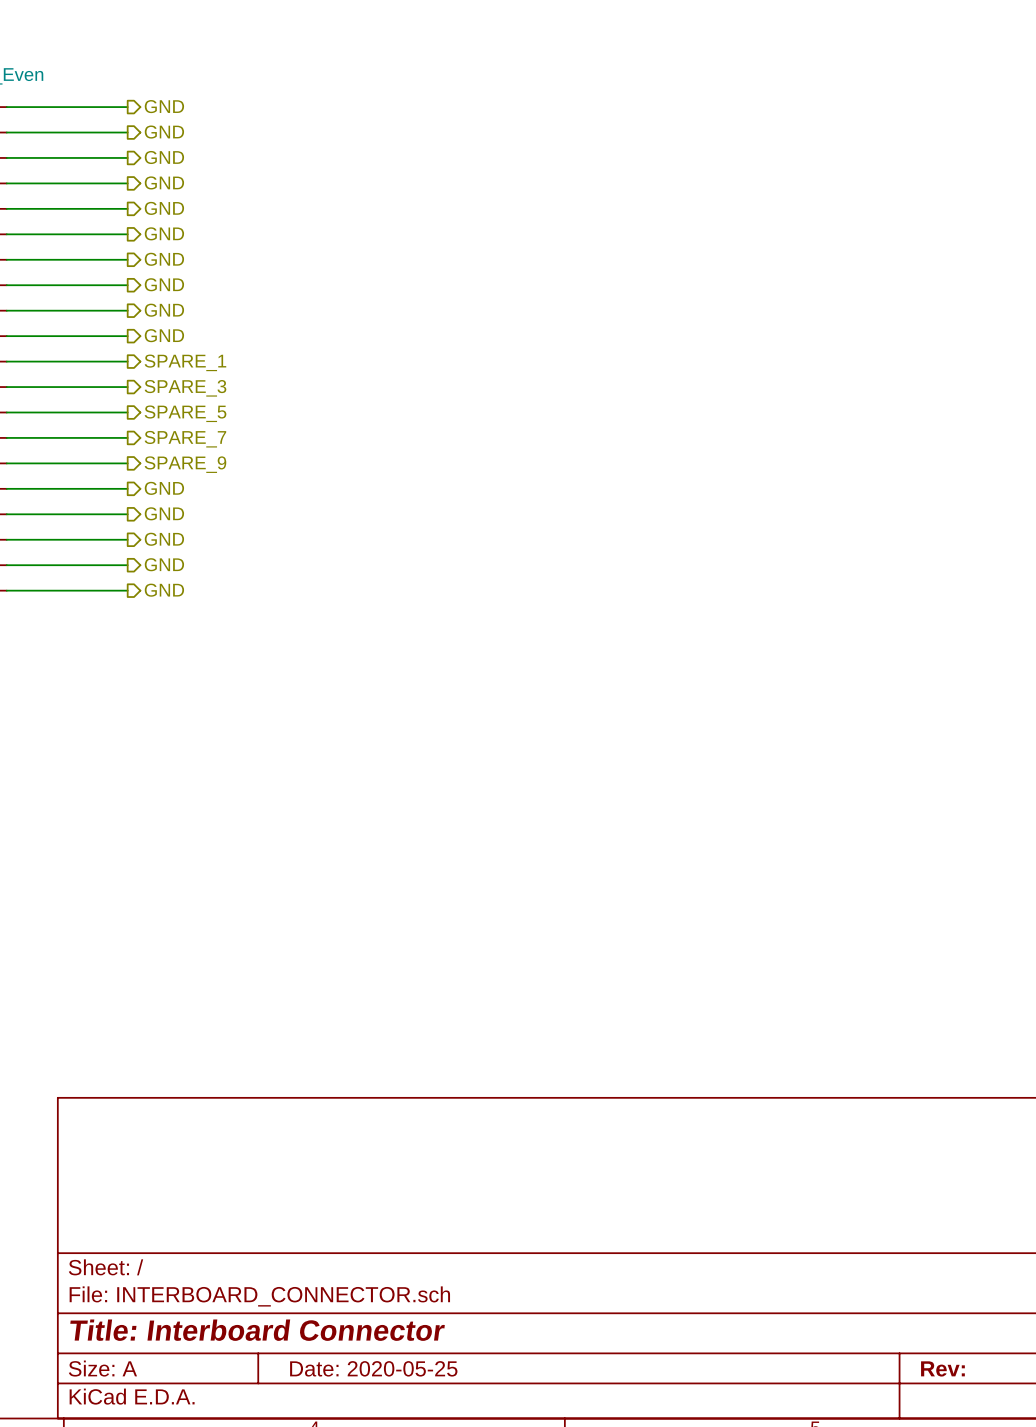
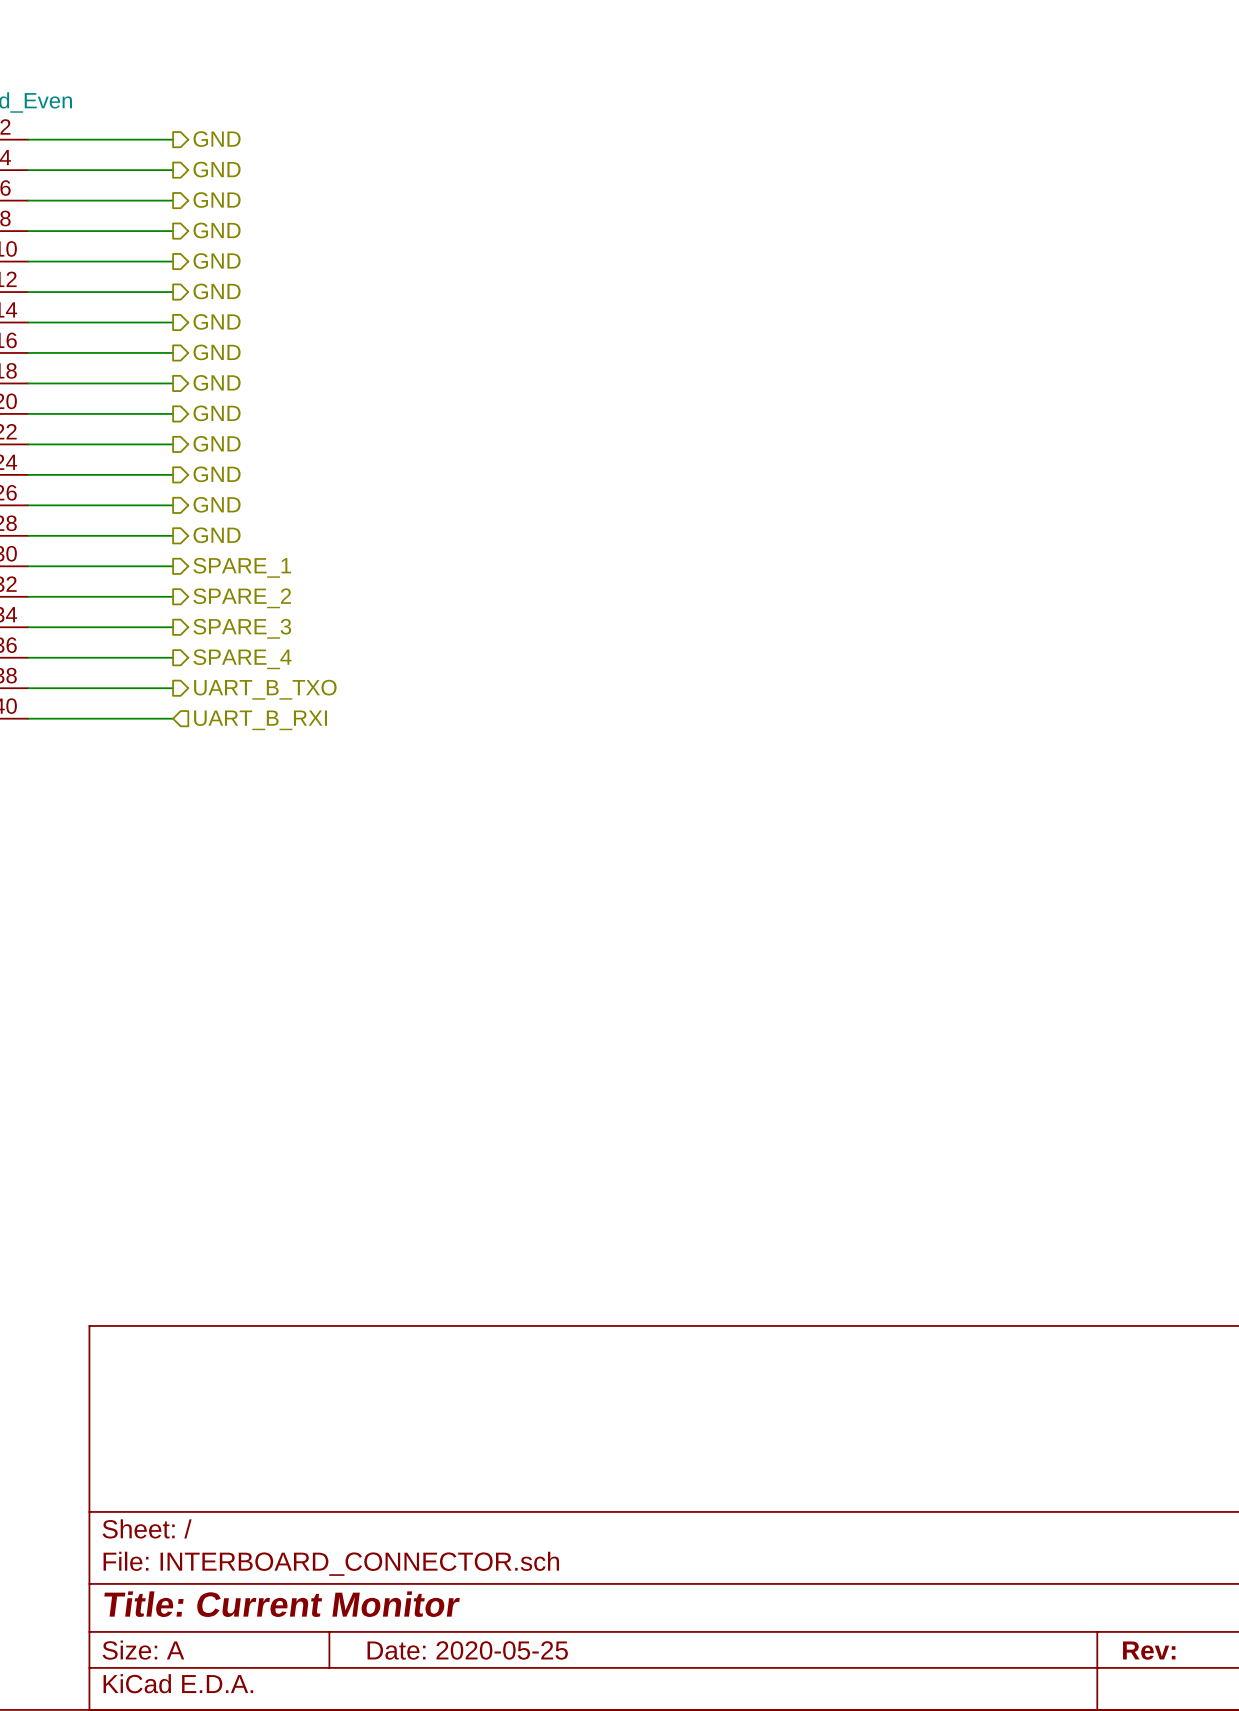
hierarchical label: SPARE_1 (185, 362) -> GND (217, 443)
hierarchical label: SPARE_3 (185, 388) -> GND (217, 474)
hierarchical label: SPARE_5 (185, 413) -> GND (217, 504)
hierarchical label: SPARE_7 (185, 439) -> GND (217, 535)
hierarchical label: SPARE_9 (185, 464) -> SPARE_1 (242, 567)
hierarchical label: GND (164, 488) -> SPARE_2 (242, 598)
hierarchical label: GND (164, 513) -> SPARE_3 (242, 628)
hierarchical label: GND (164, 539) -> SPARE_4 (242, 659)
hierarchical label: GND (164, 564) -> UART_B_TXO (265, 689)
hierarchical label shape: output (164, 590) -> input (260, 720)
hierarchical label: GND (164, 590) -> UART_B_RXI (260, 720)
title block: Title: Interboard Connector (257, 1330) -> Title: Current Monitor (282, 1604)

